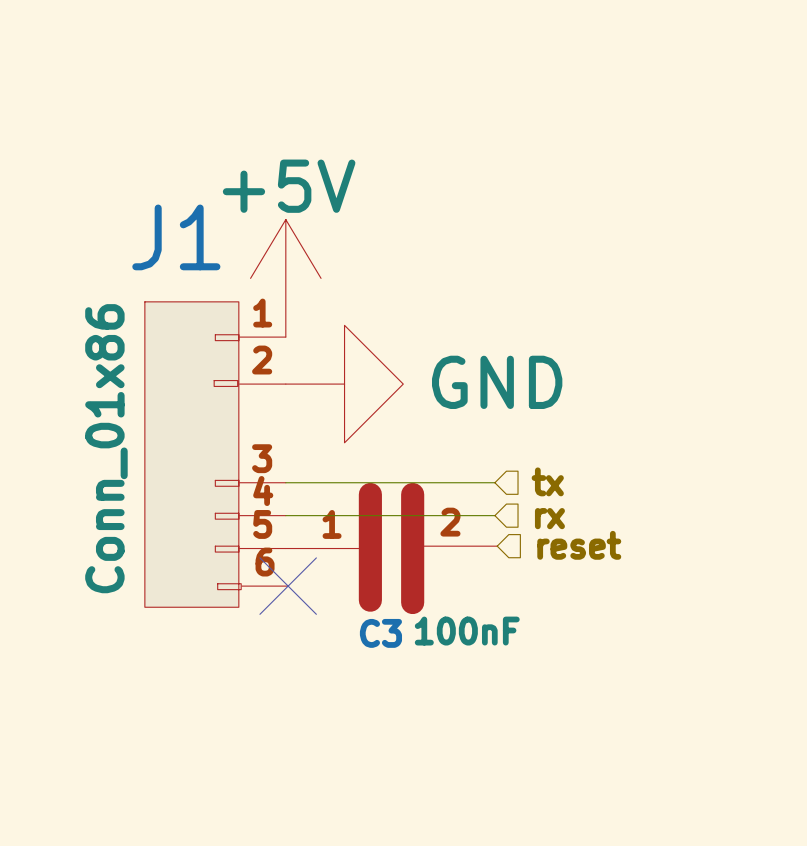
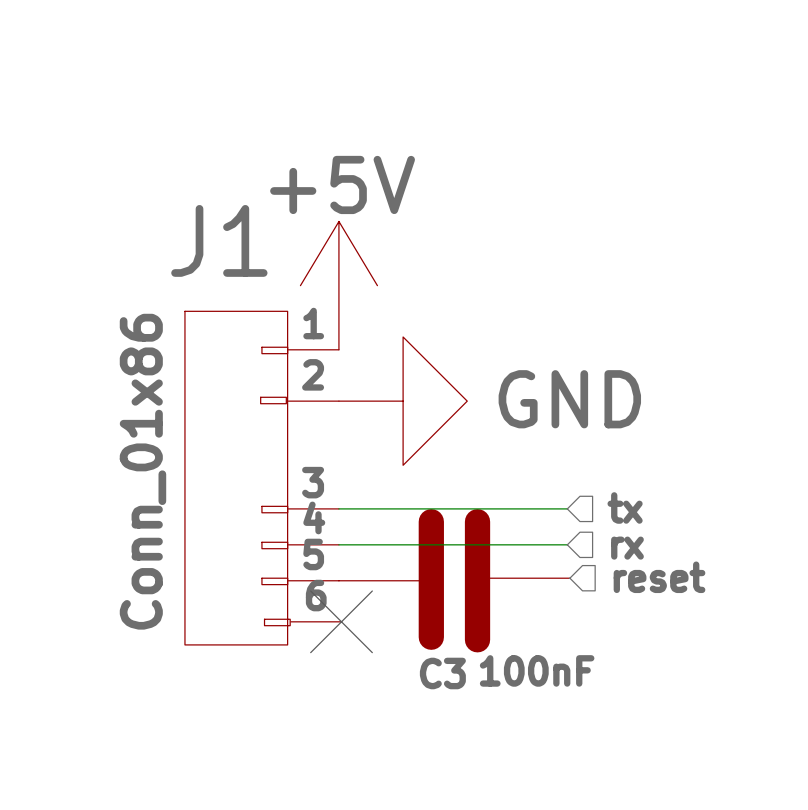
C3 pin number: 2 (450, 522) -> none
C3 pin number: 1 (332, 524) -> none

